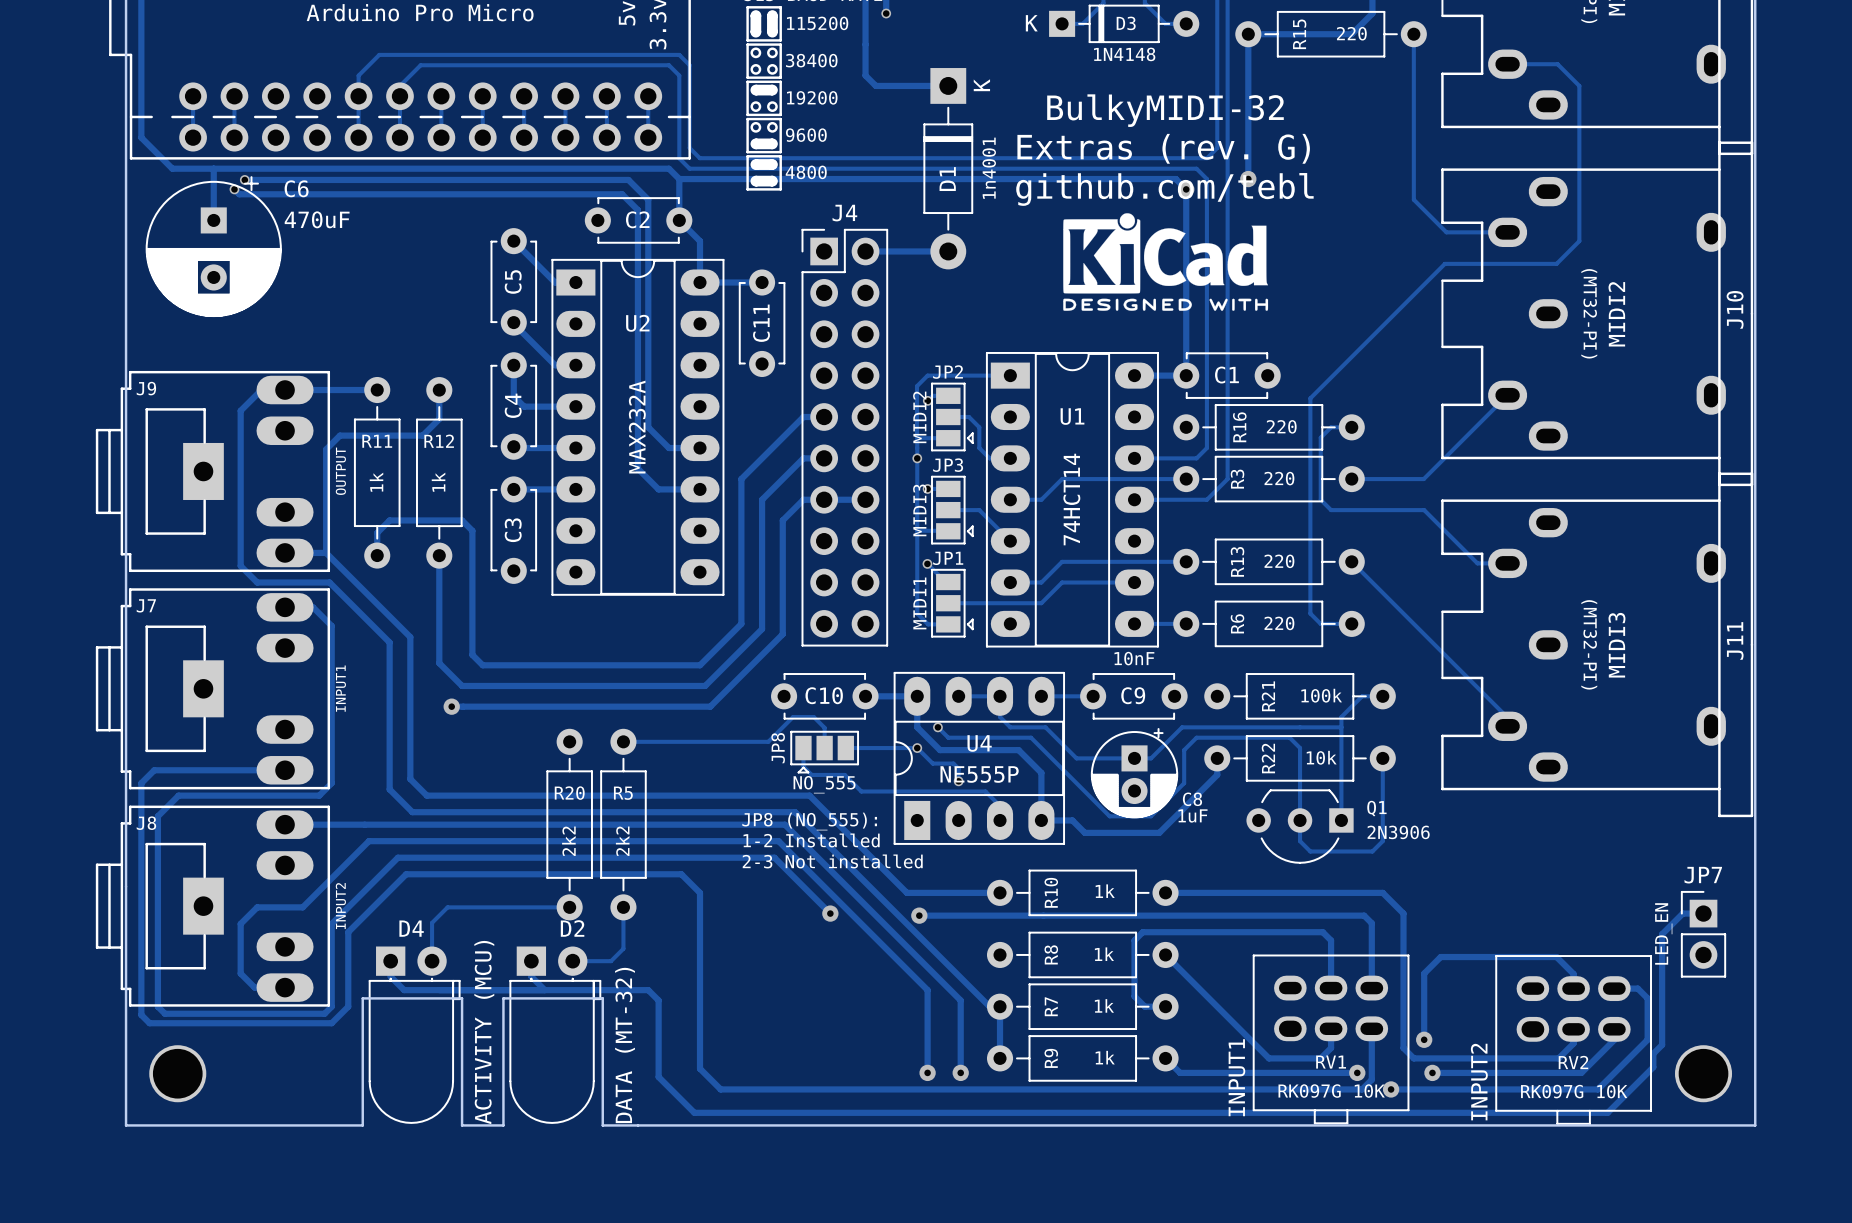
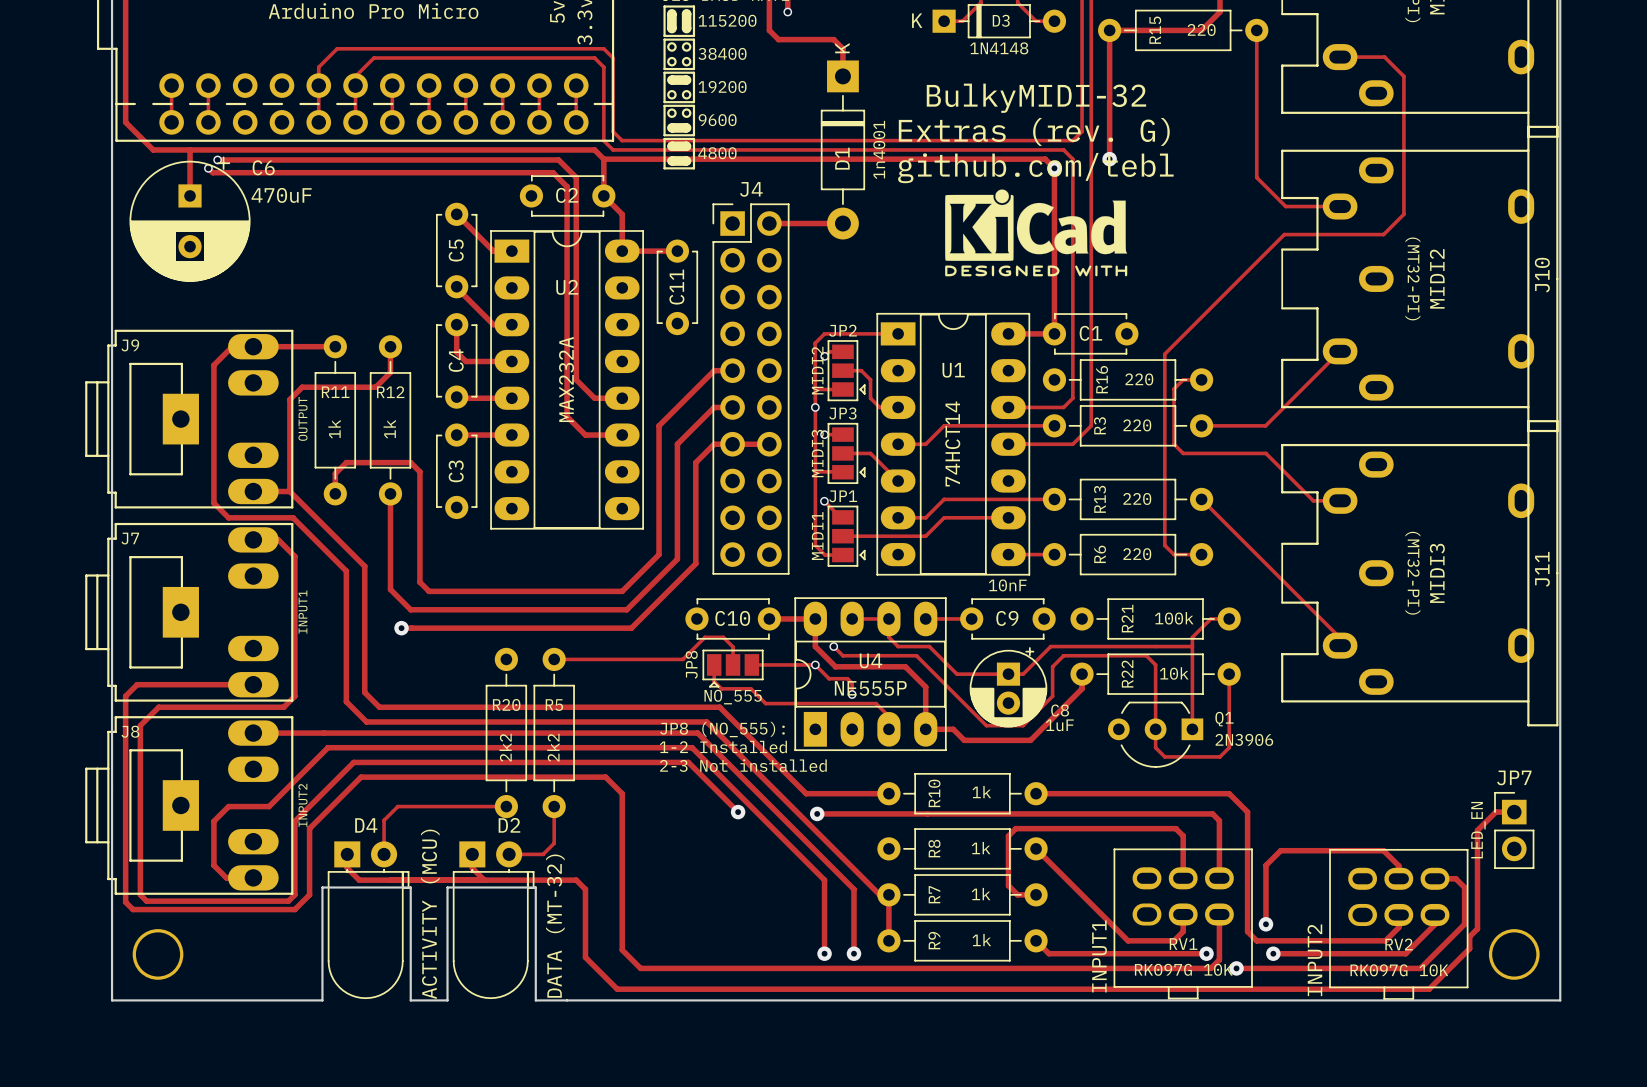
track: (865, 34) (865, 75) (875, 85) (948, 85) -> (769, 30) (778, 39) (833, 39) (842, 48) (842, 76)
D1 text position: K (981, 85) -> K (842, 48)

